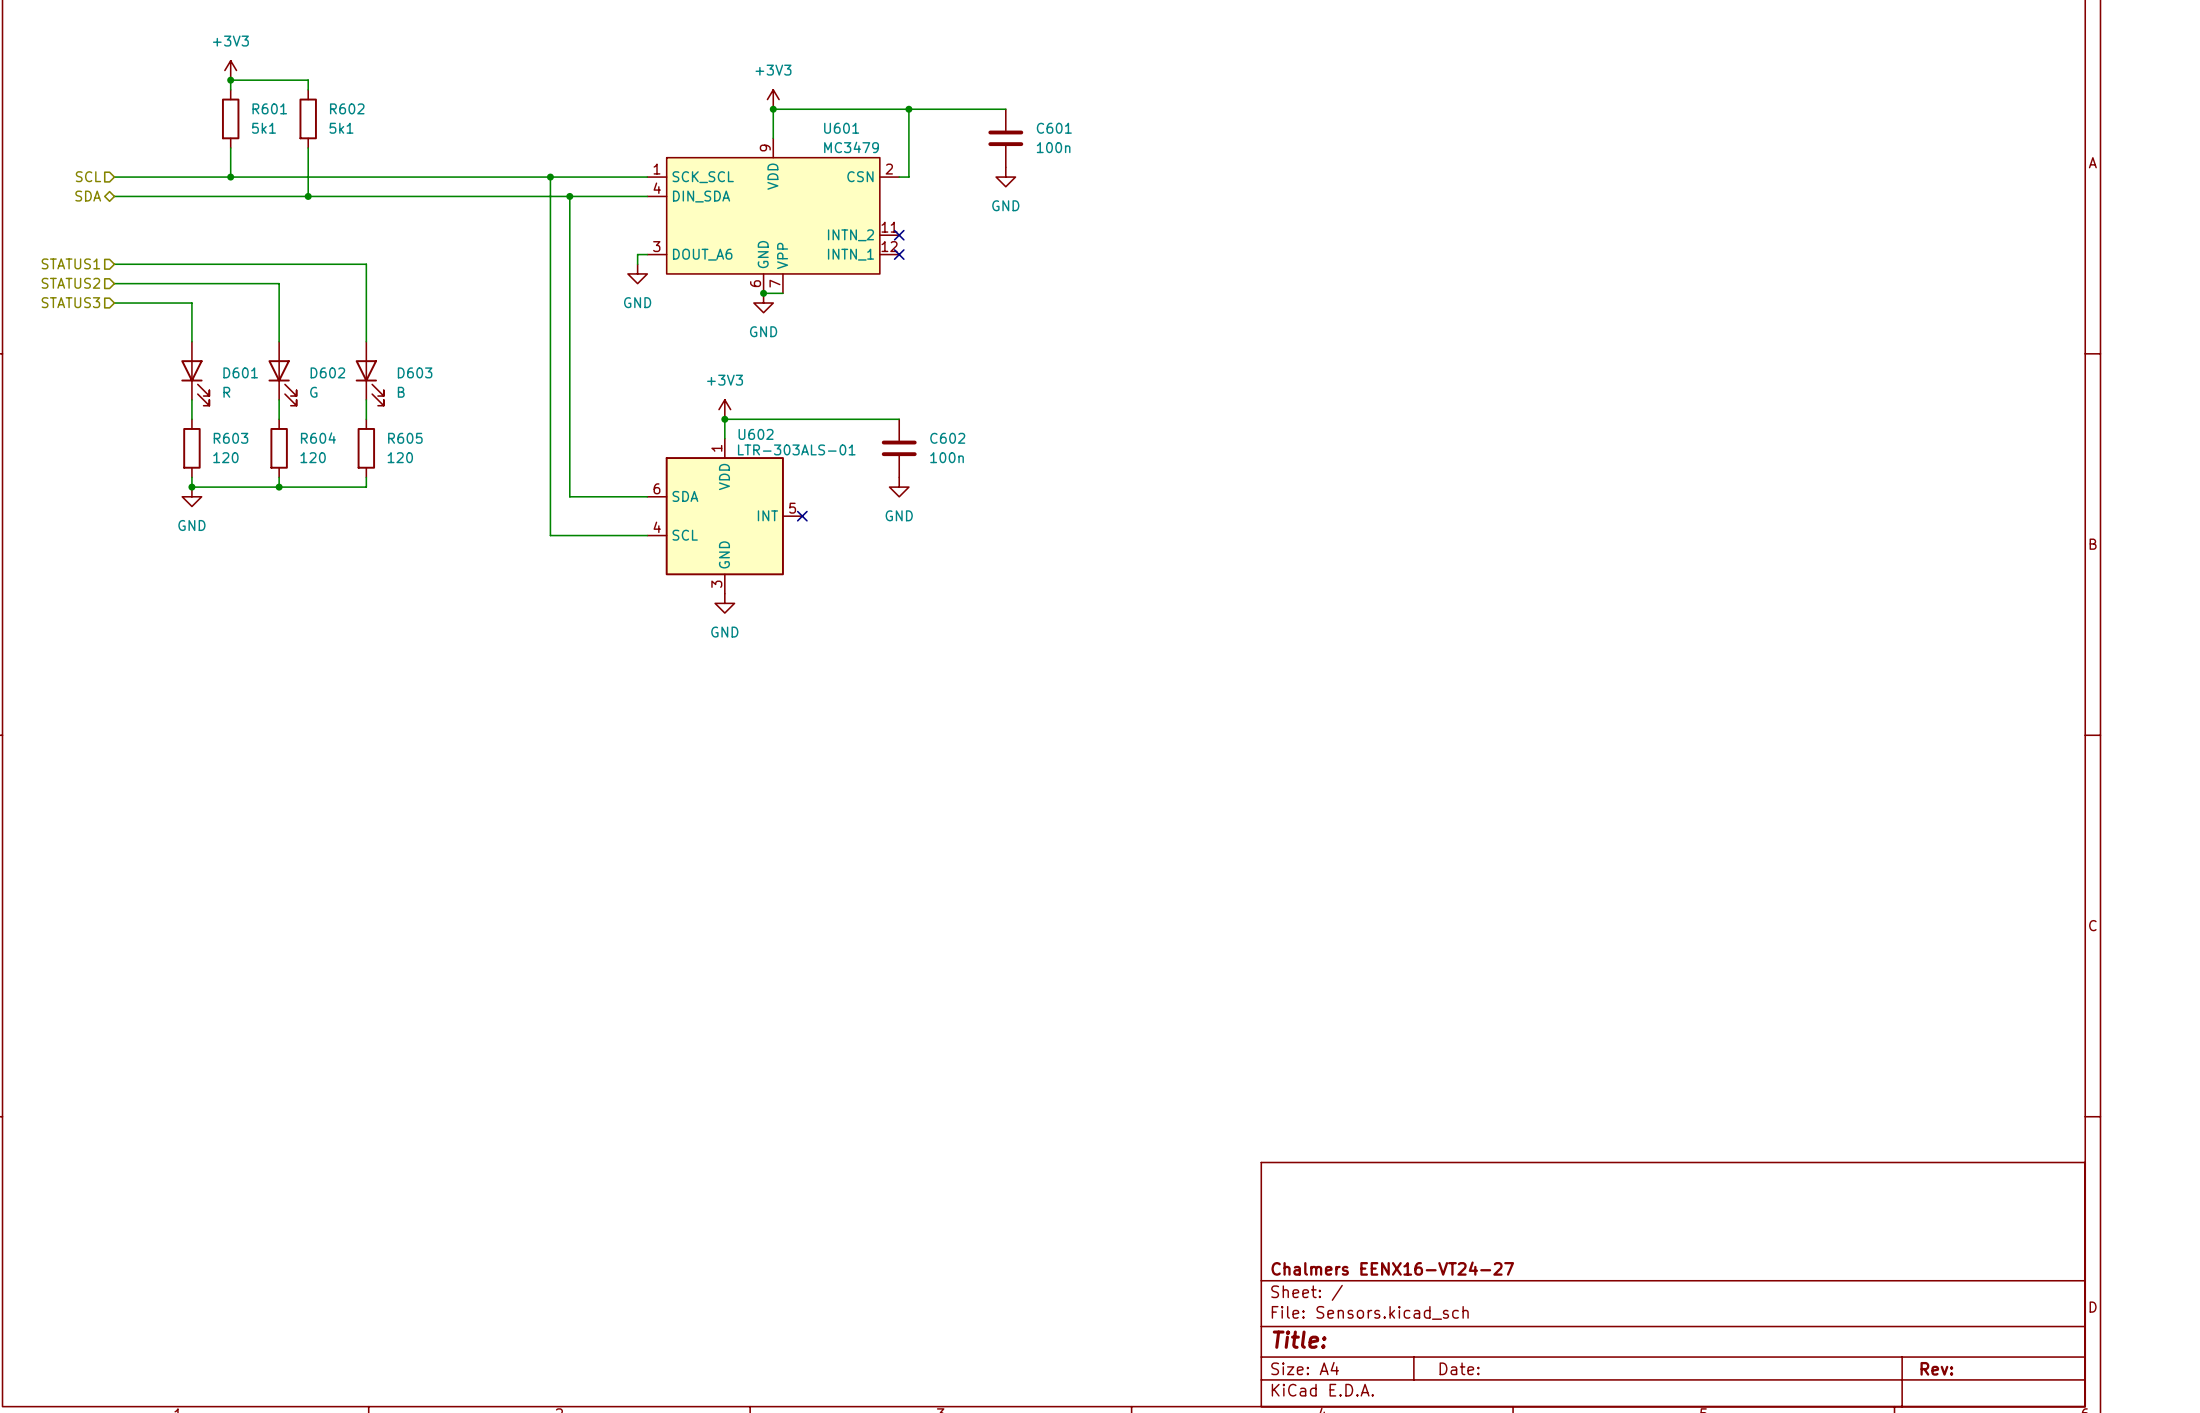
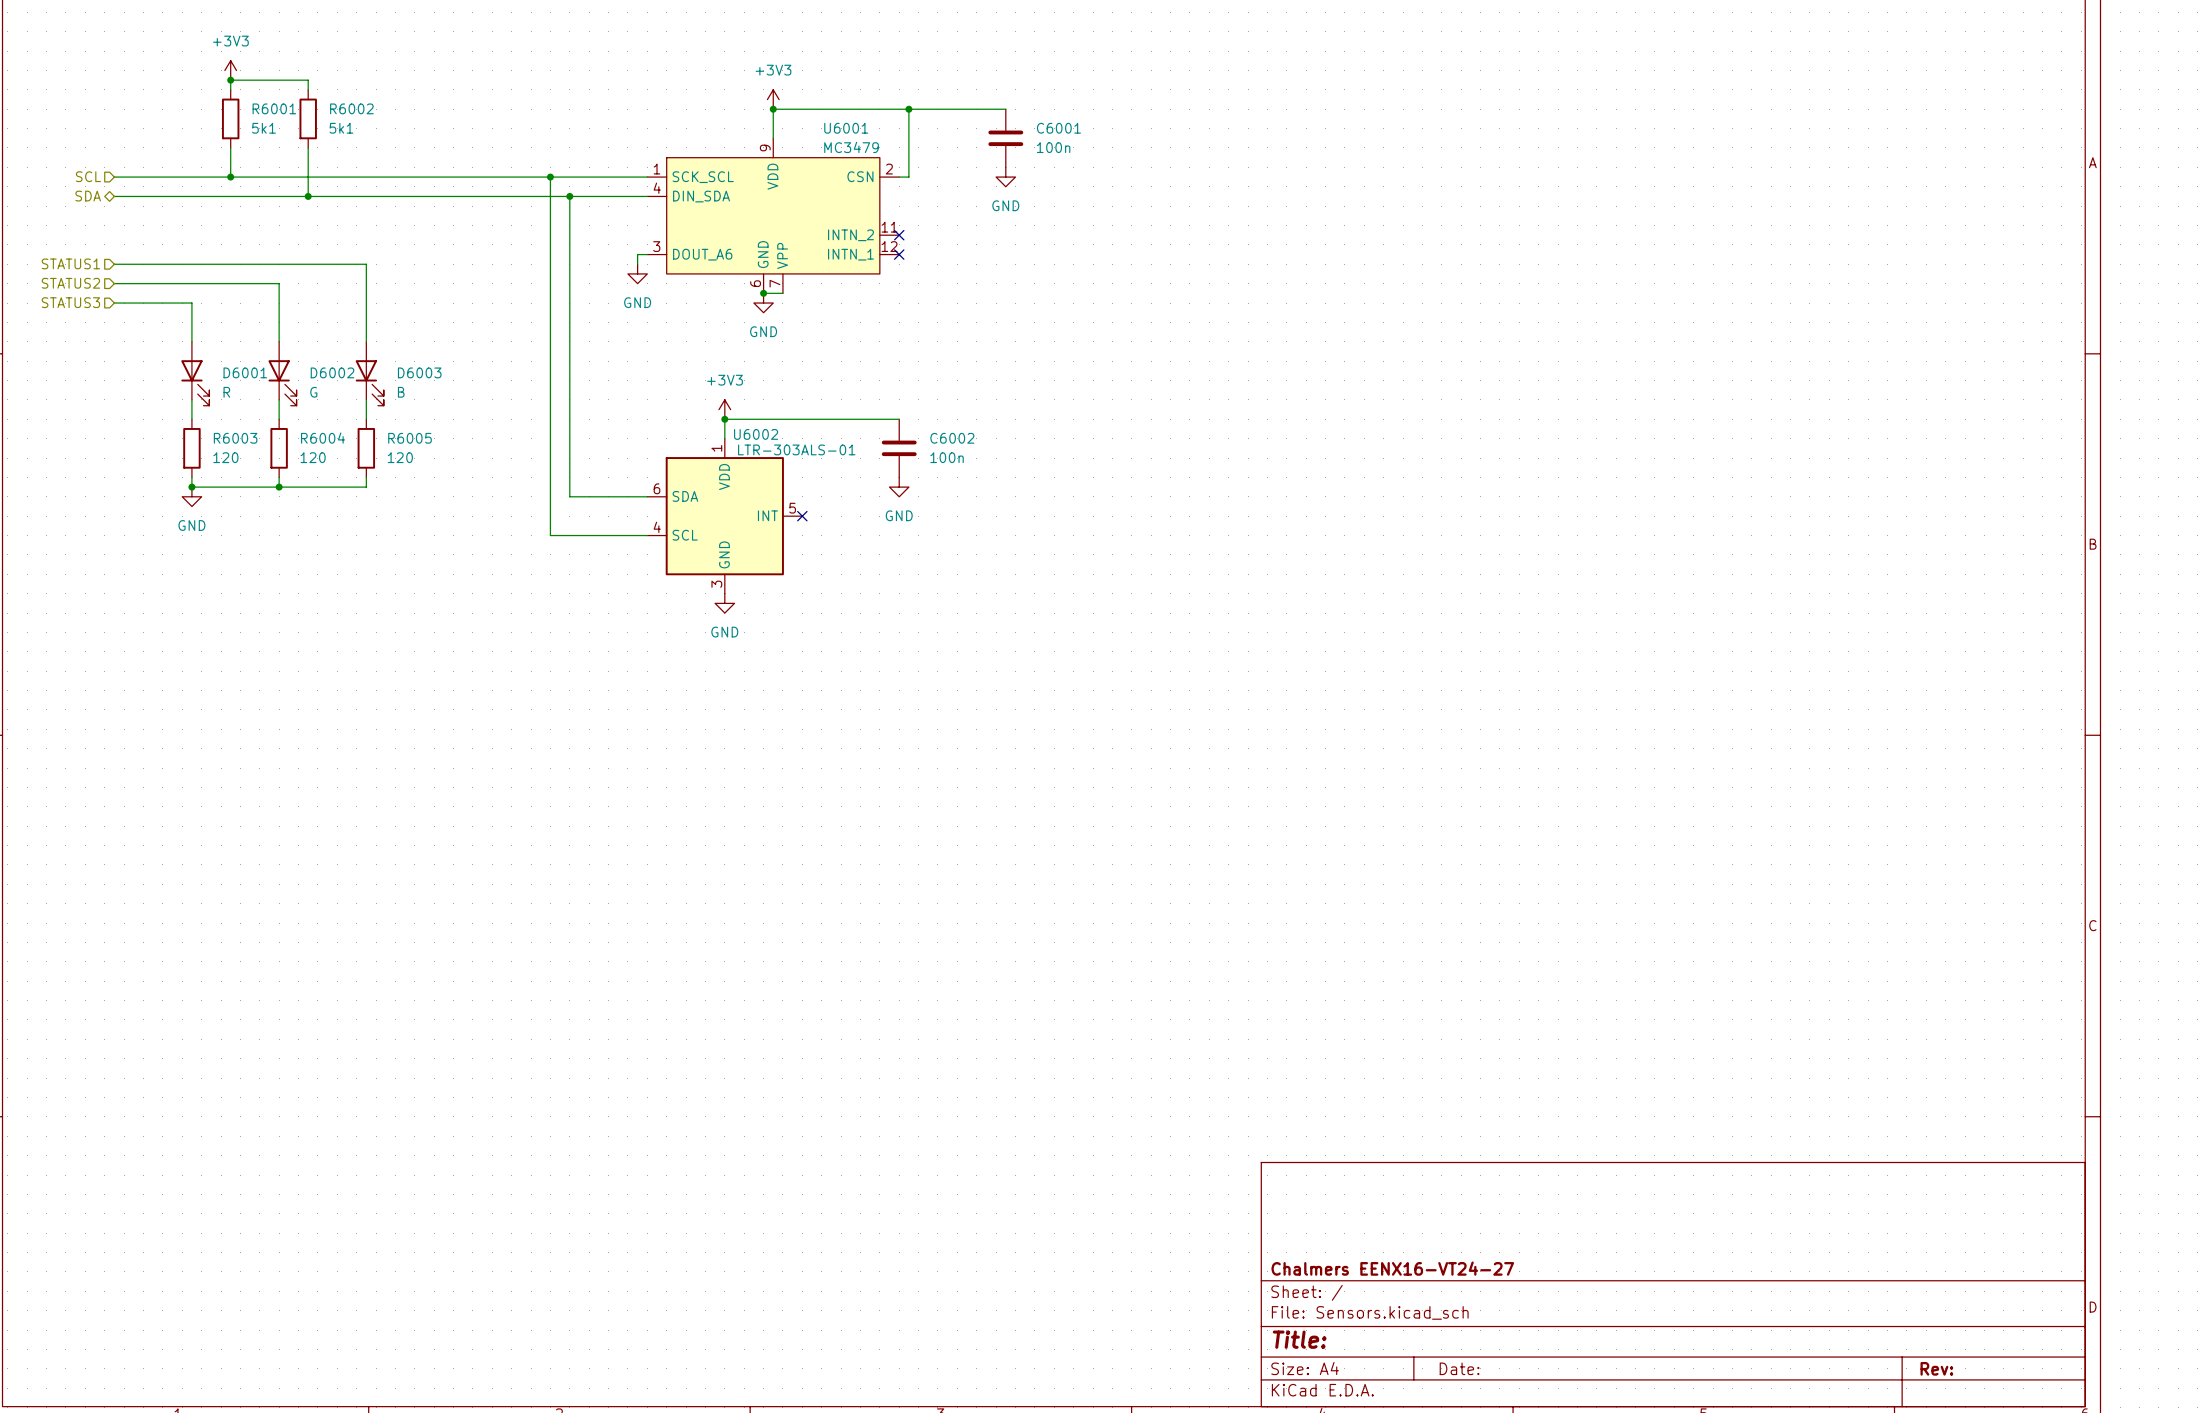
R601 name: R601 (269, 108) -> R6001 (274, 108)
R602 name: R602 (347, 108) -> R6002 (351, 108)
U601 name: U601 (841, 128) -> U6001 (846, 128)
C601 name: C601 (1054, 128) -> C6001 (1058, 128)
D601 name: D601 (240, 372) -> D6001 (245, 372)
D602 name: D602 (327, 372) -> D6002 (332, 372)
D603 name: D603 (415, 372) -> D6003 (419, 372)
U602 name: U602 (756, 434) -> U6002 (756, 434)
R603 name: R603 (230, 438) -> R6003 (235, 438)
R604 name: R604 (318, 438) -> R6004 (323, 438)
R605 name: R605 (405, 438) -> R6005 (410, 438)
C602 name: C602 (947, 438) -> C6002 (952, 438)

